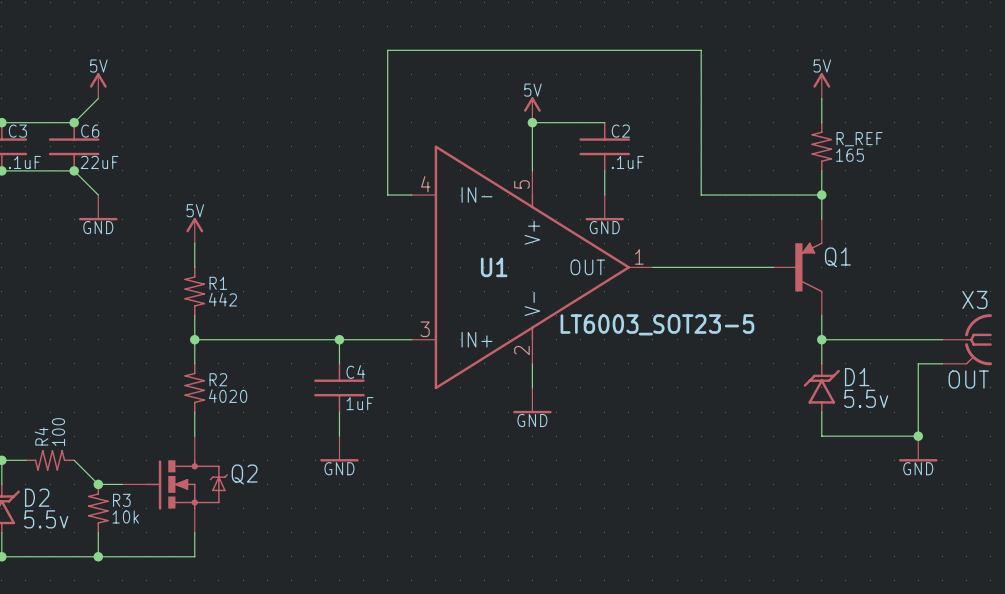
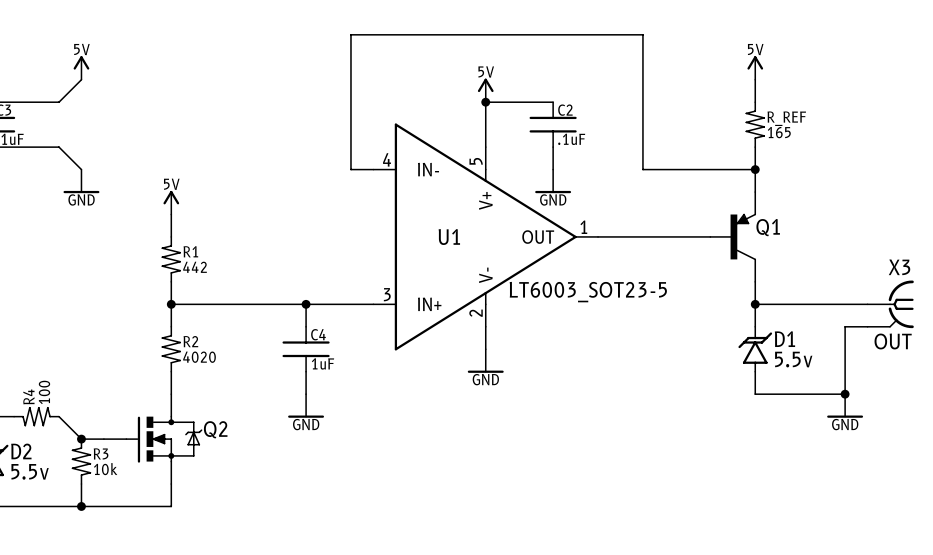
junction: (74, 122) -> none
C6: 22uF (74, 146) -> none
junction: (74, 170) -> none

